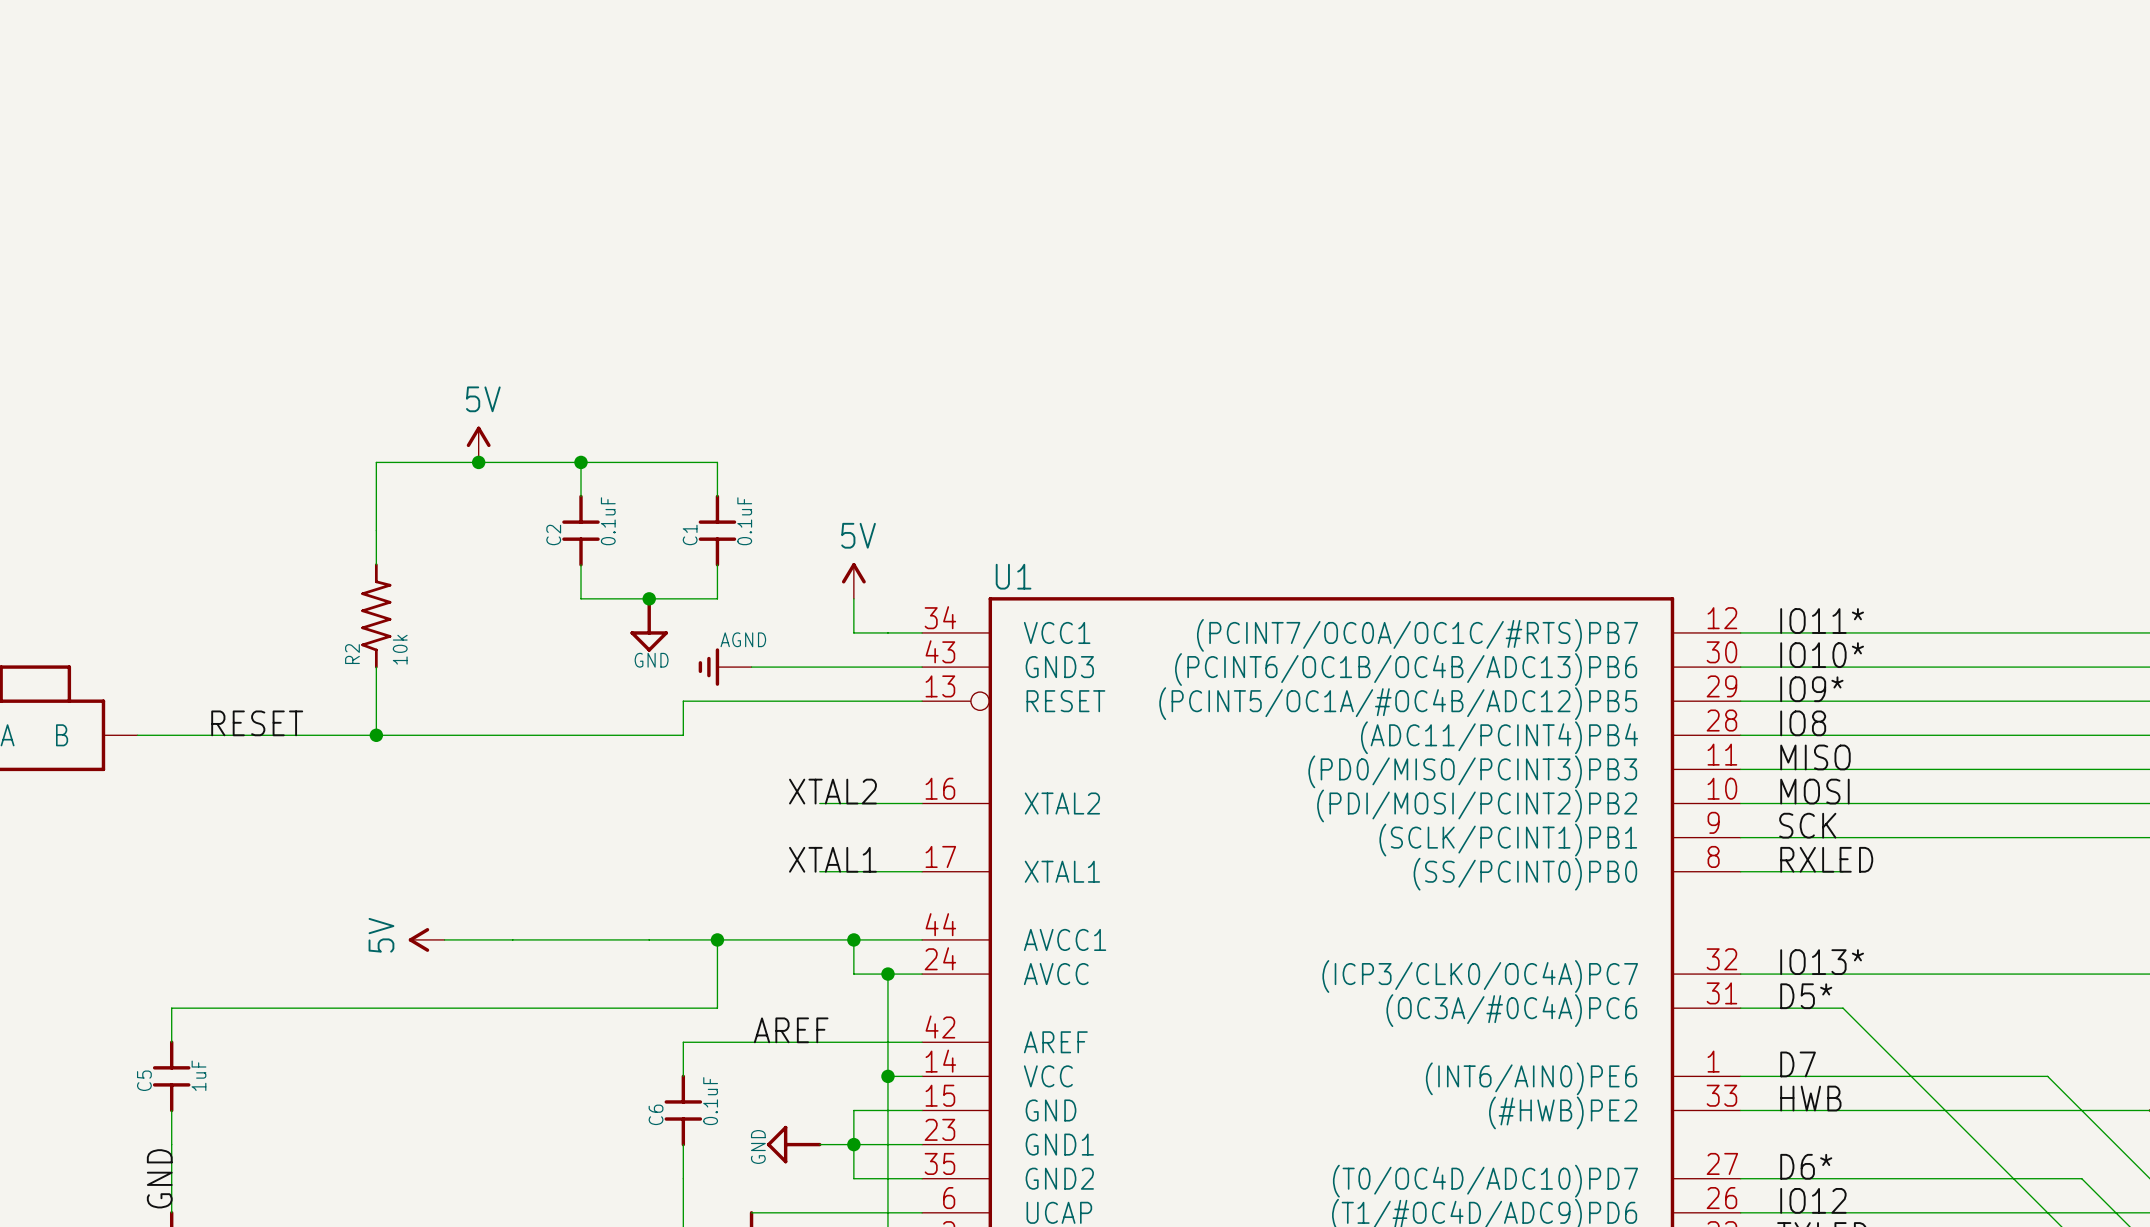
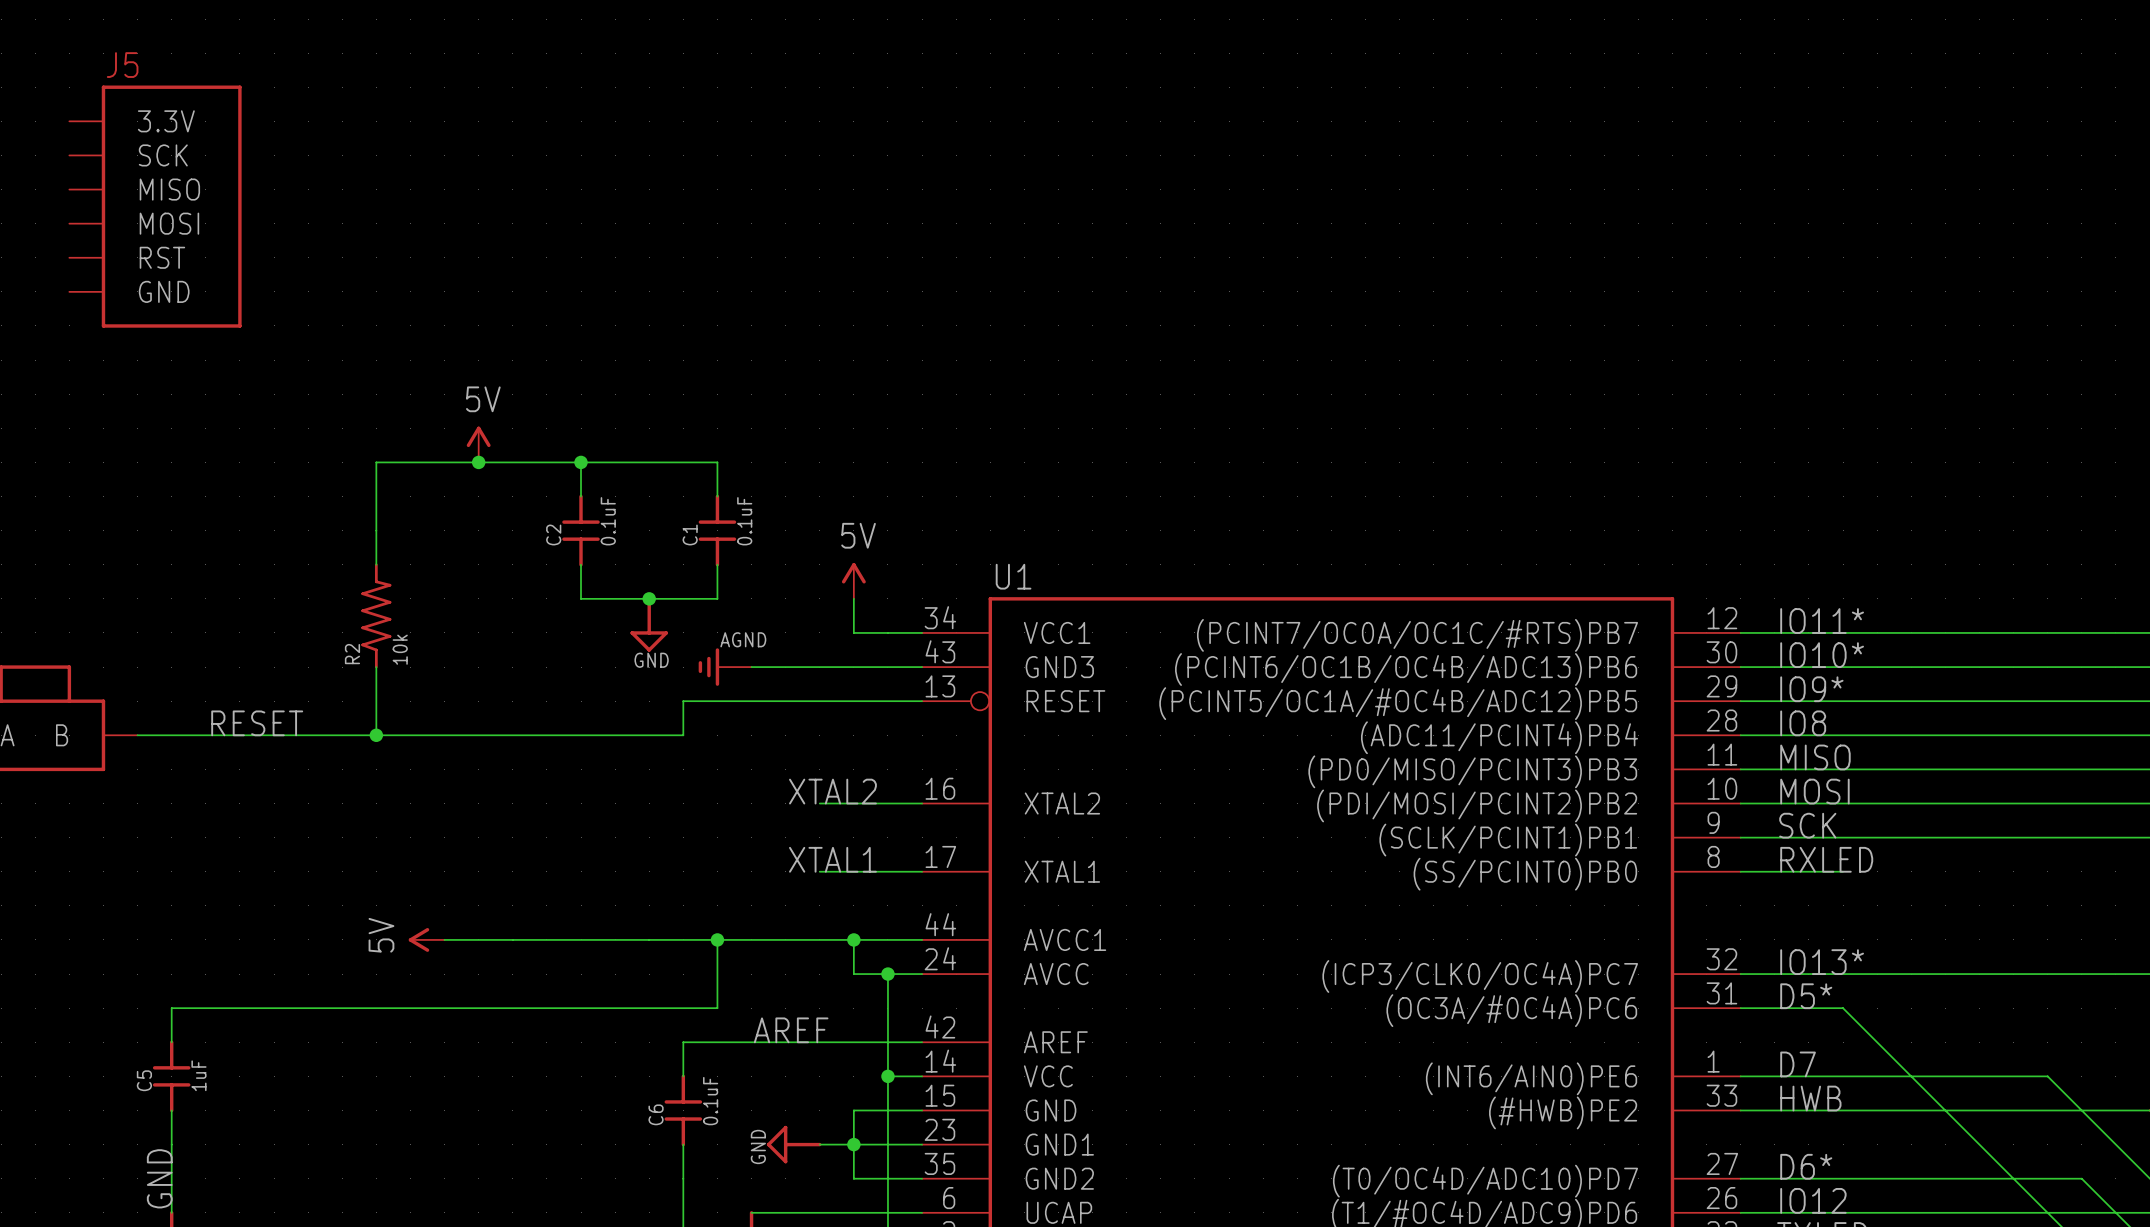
J5: none -> (155, 206)

